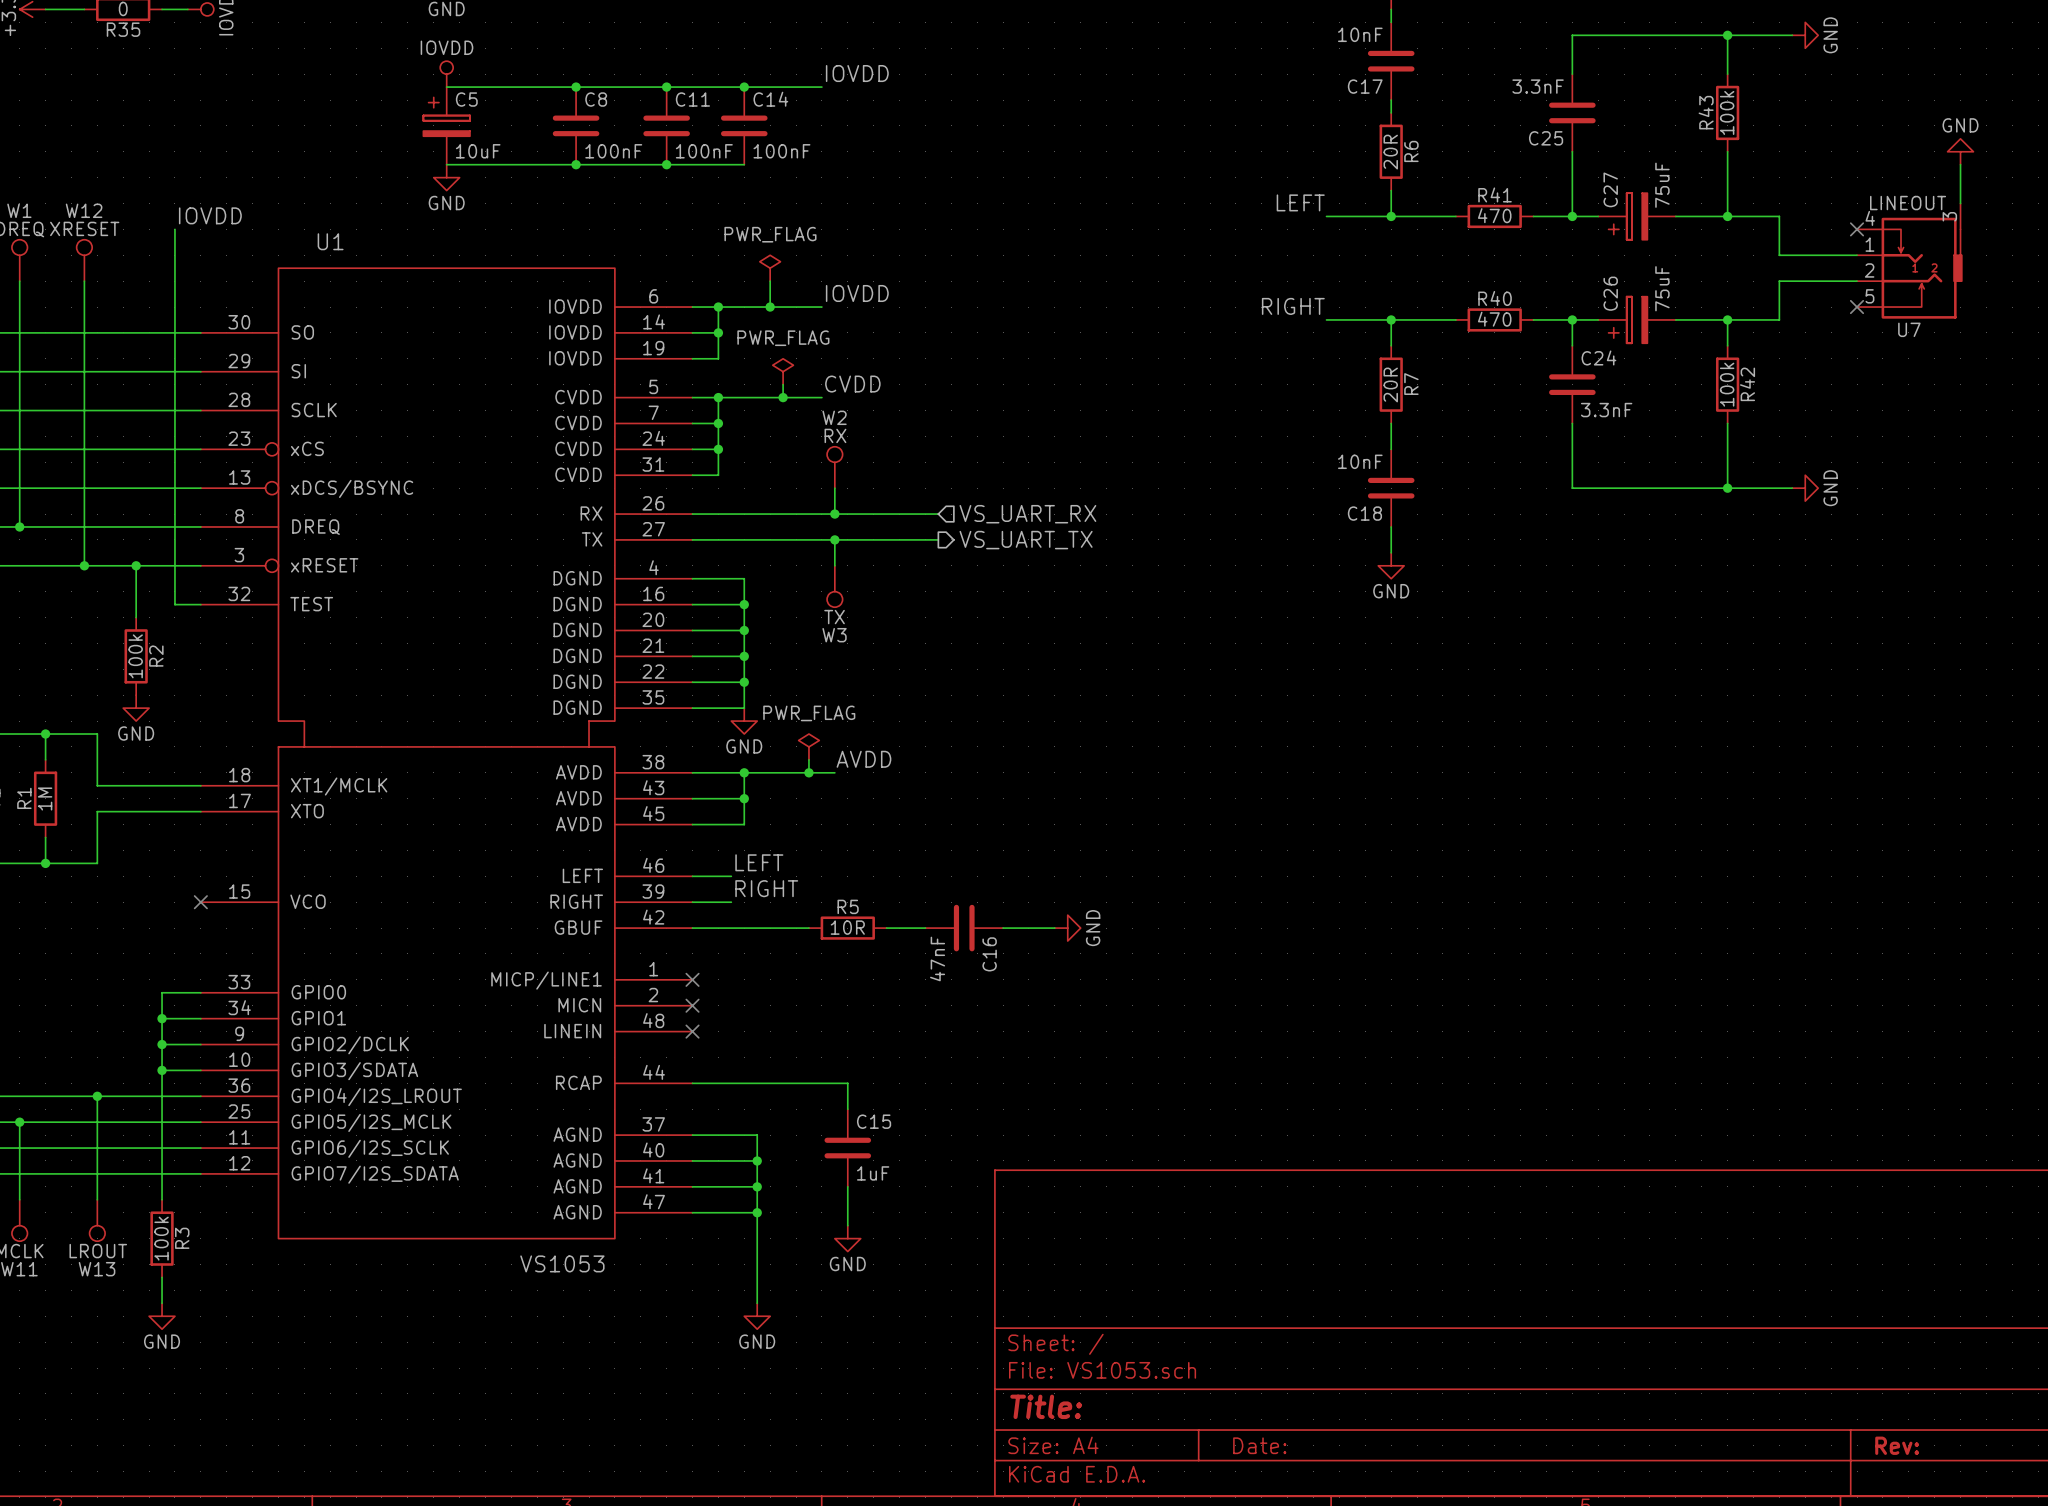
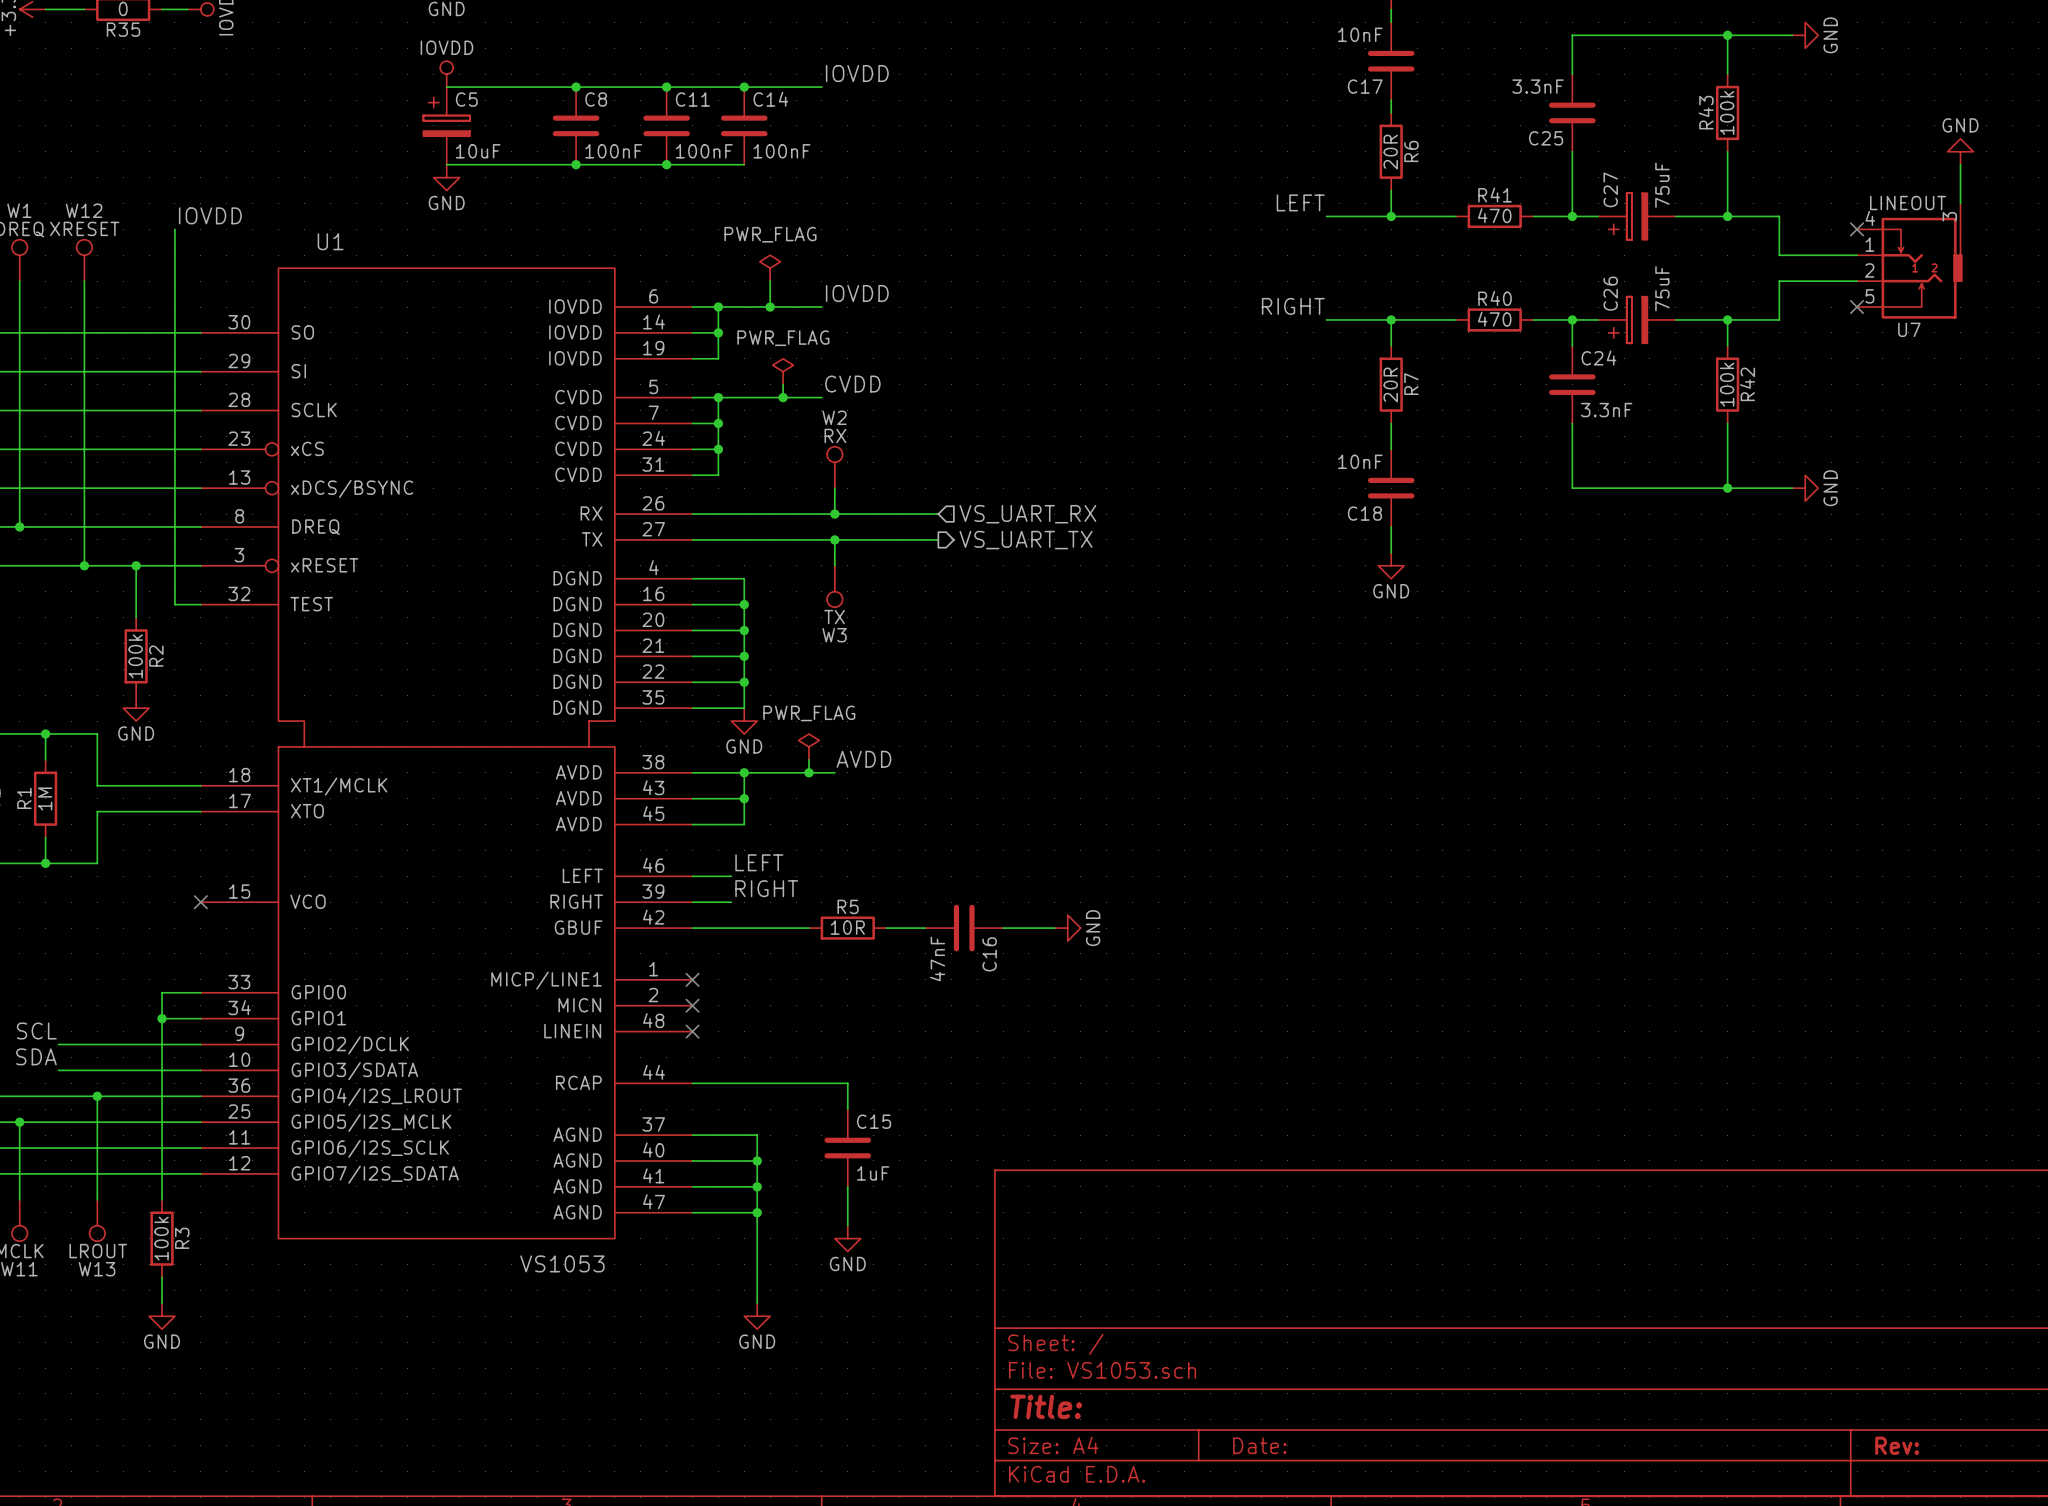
label: none -> SCL (36, 1030)
wire: none -> (58, 1044) (162, 1044)
junction: (162, 1044) -> none
label: none -> SDA (36, 1056)
wire: none -> (58, 1070) (162, 1070)
junction: (162, 1070) -> none

